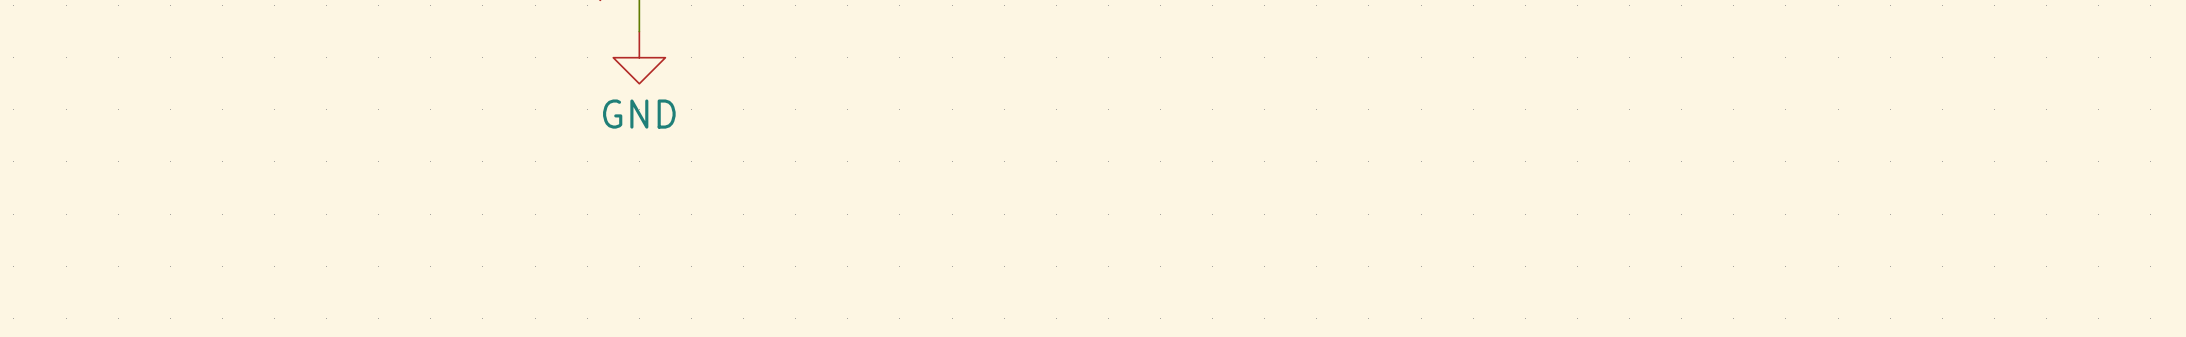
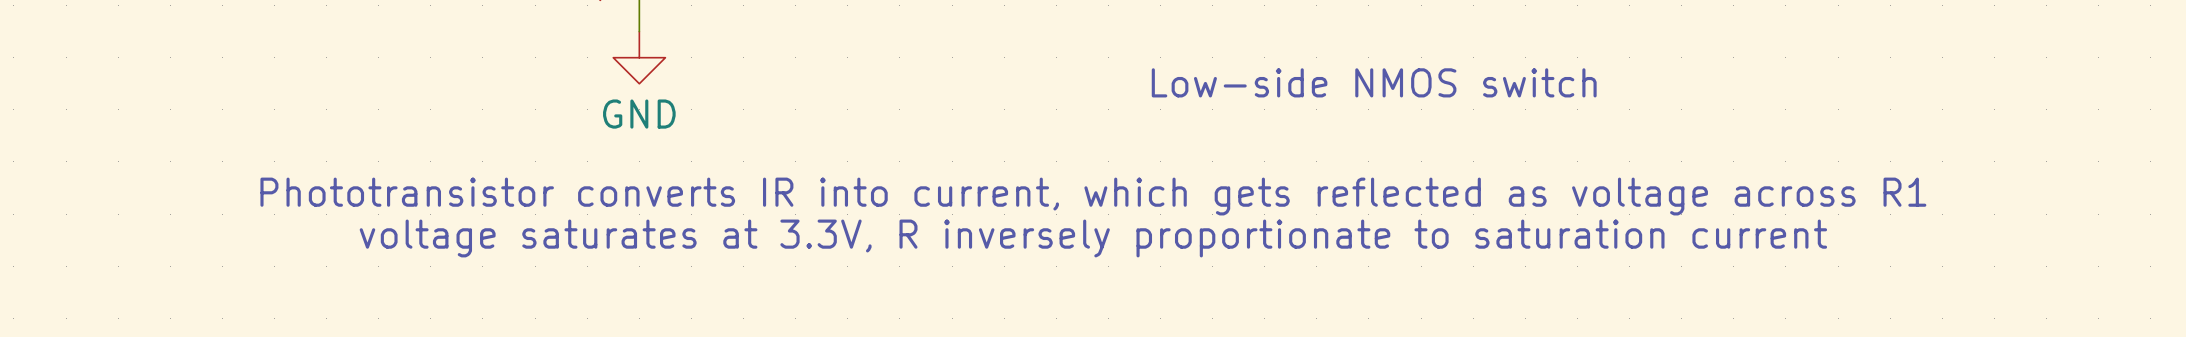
text: none -> Low-side NMOS switch (1374, 82)
text: none -> Phototransistor converts IR into current, which gets reflected as voltage across R1 (1093, 196)
text: none -> voltage saturates at 3.3V, R inversely proportionate to saturation current (1093, 238)

